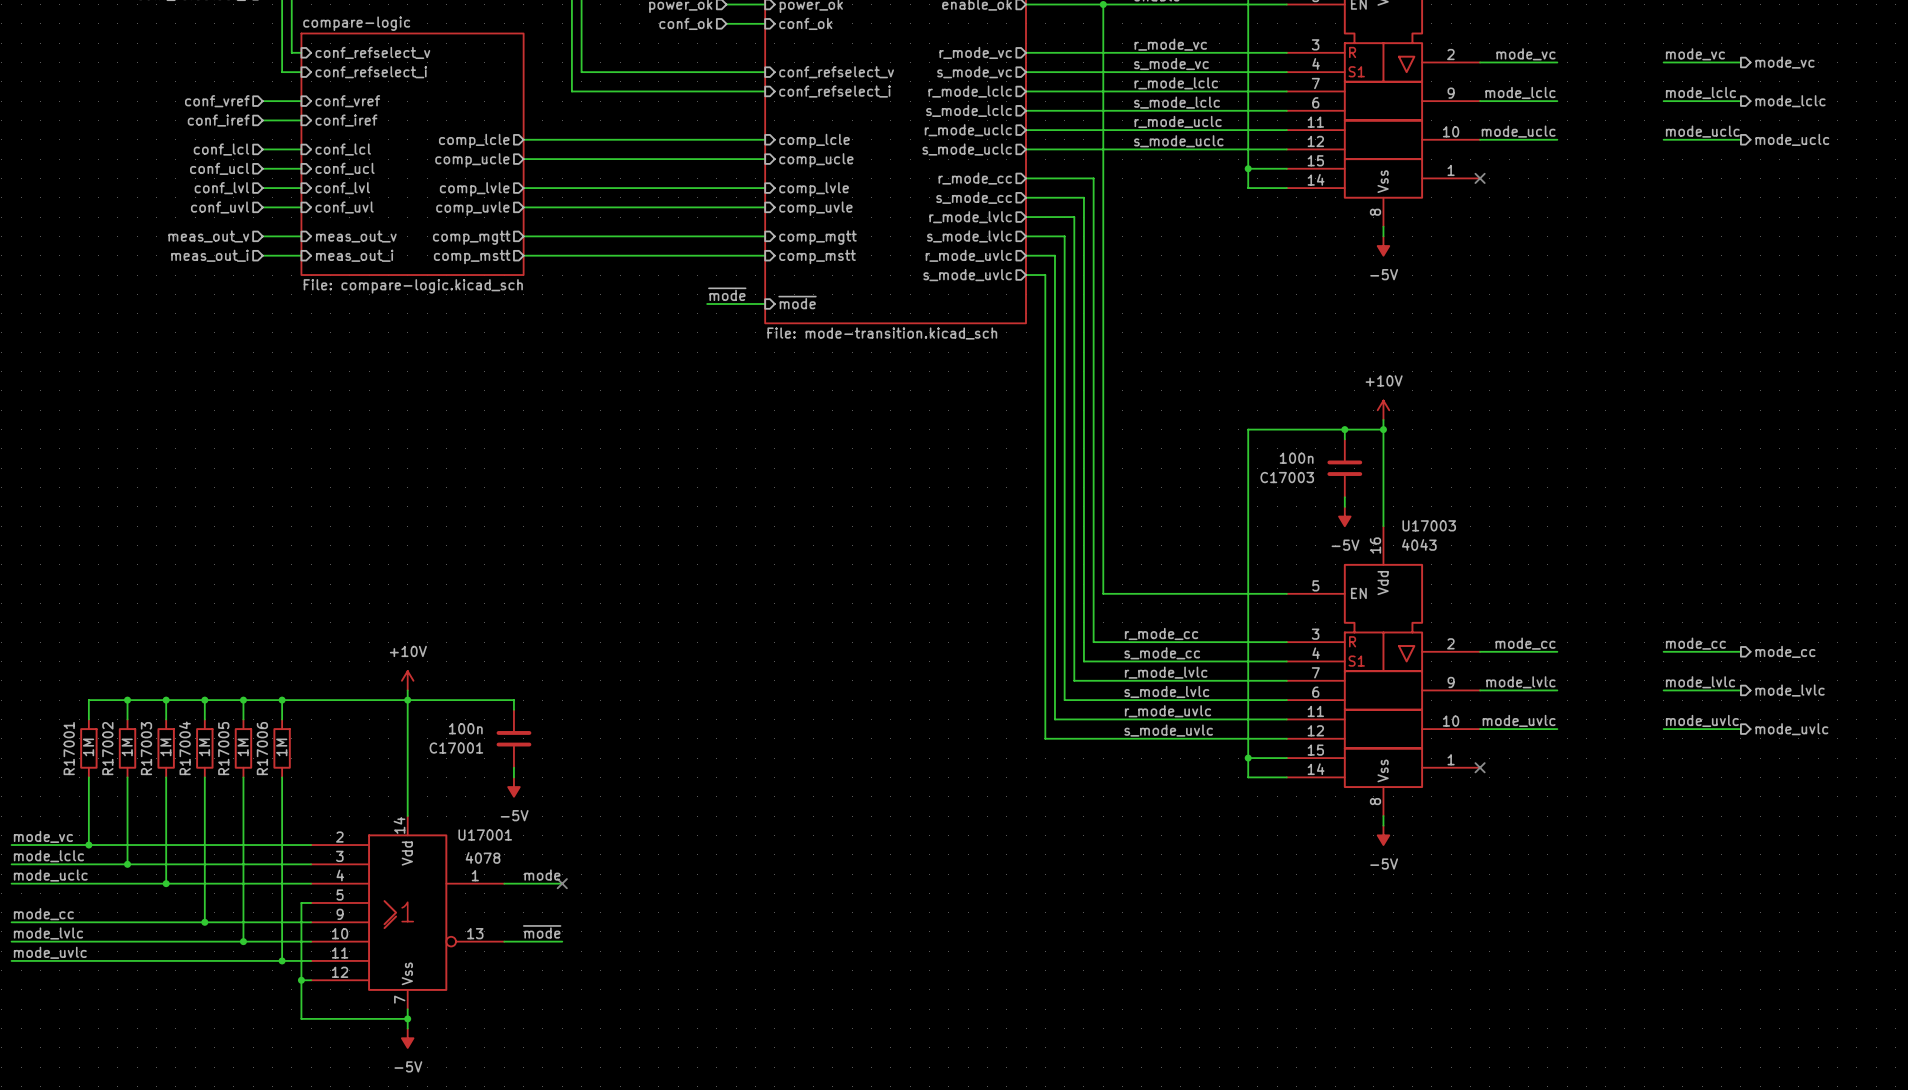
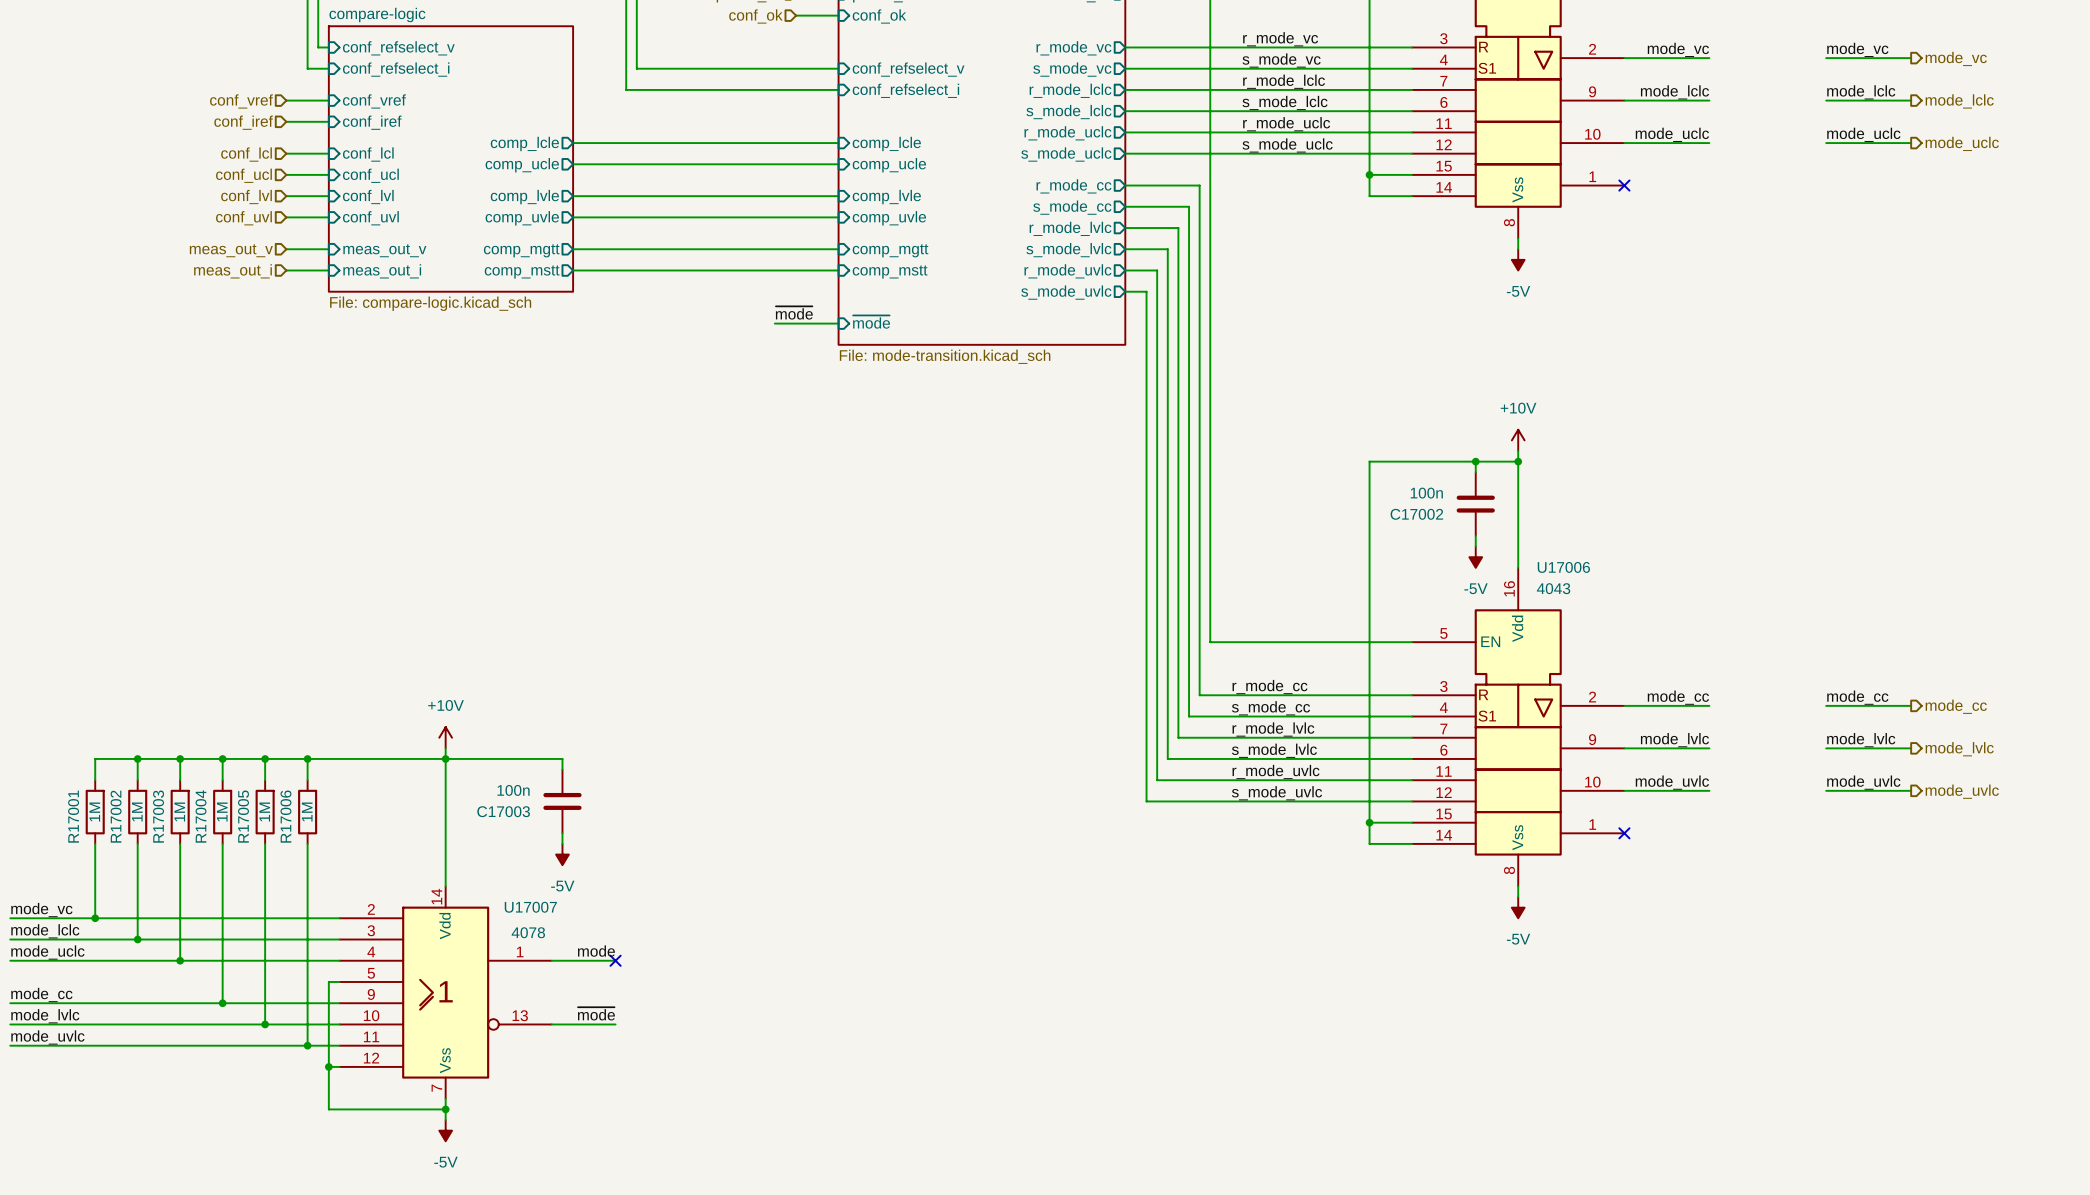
C17003 name: C17003 (1287, 477) -> C17002 (1416, 514)
U17003 name: U17003 (1429, 525) -> U17006 (1563, 567)
C17001 name: C17001 (456, 748) -> C17003 (503, 811)
U17001 name: U17001 (485, 835) -> U17007 (530, 907)

